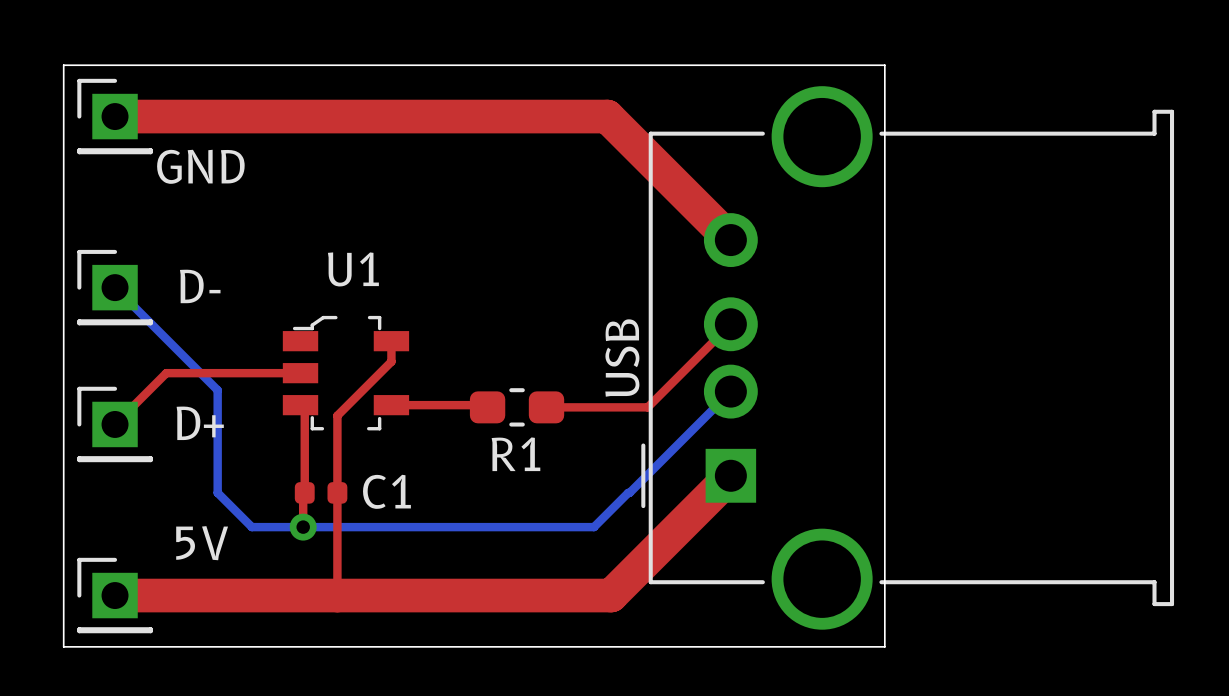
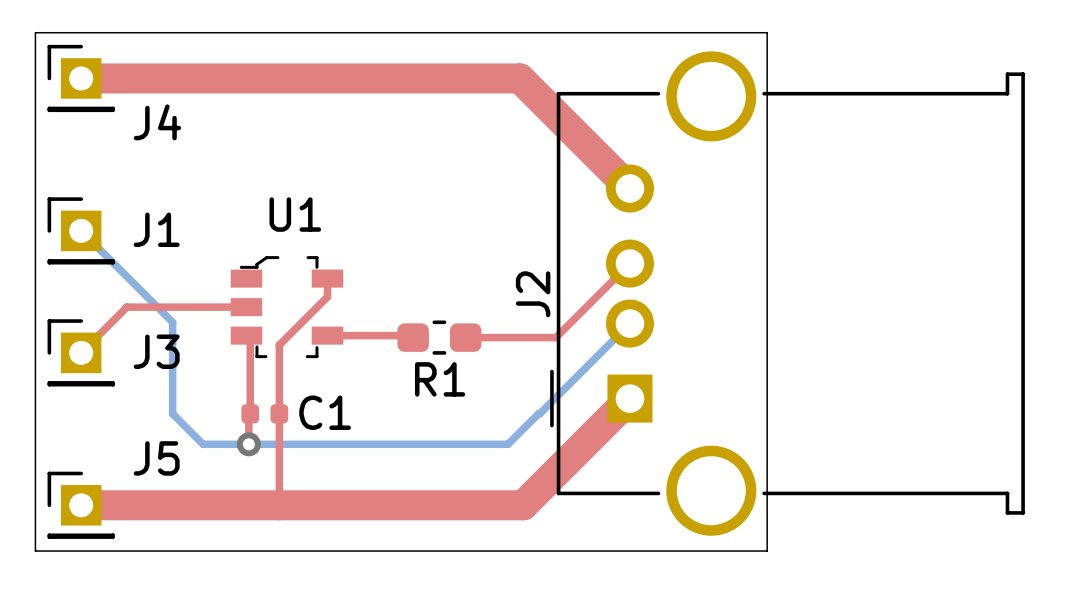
GND name: GND (200, 166) -> J4 (157, 122)
D- name: D- (200, 286) -> J1 (156, 229)
USB name: USB (622, 358) -> J2 (533, 294)
D+ name: D+ (200, 423) -> J3 (156, 351)
5V name: 5V (202, 543) -> J5 (156, 458)

